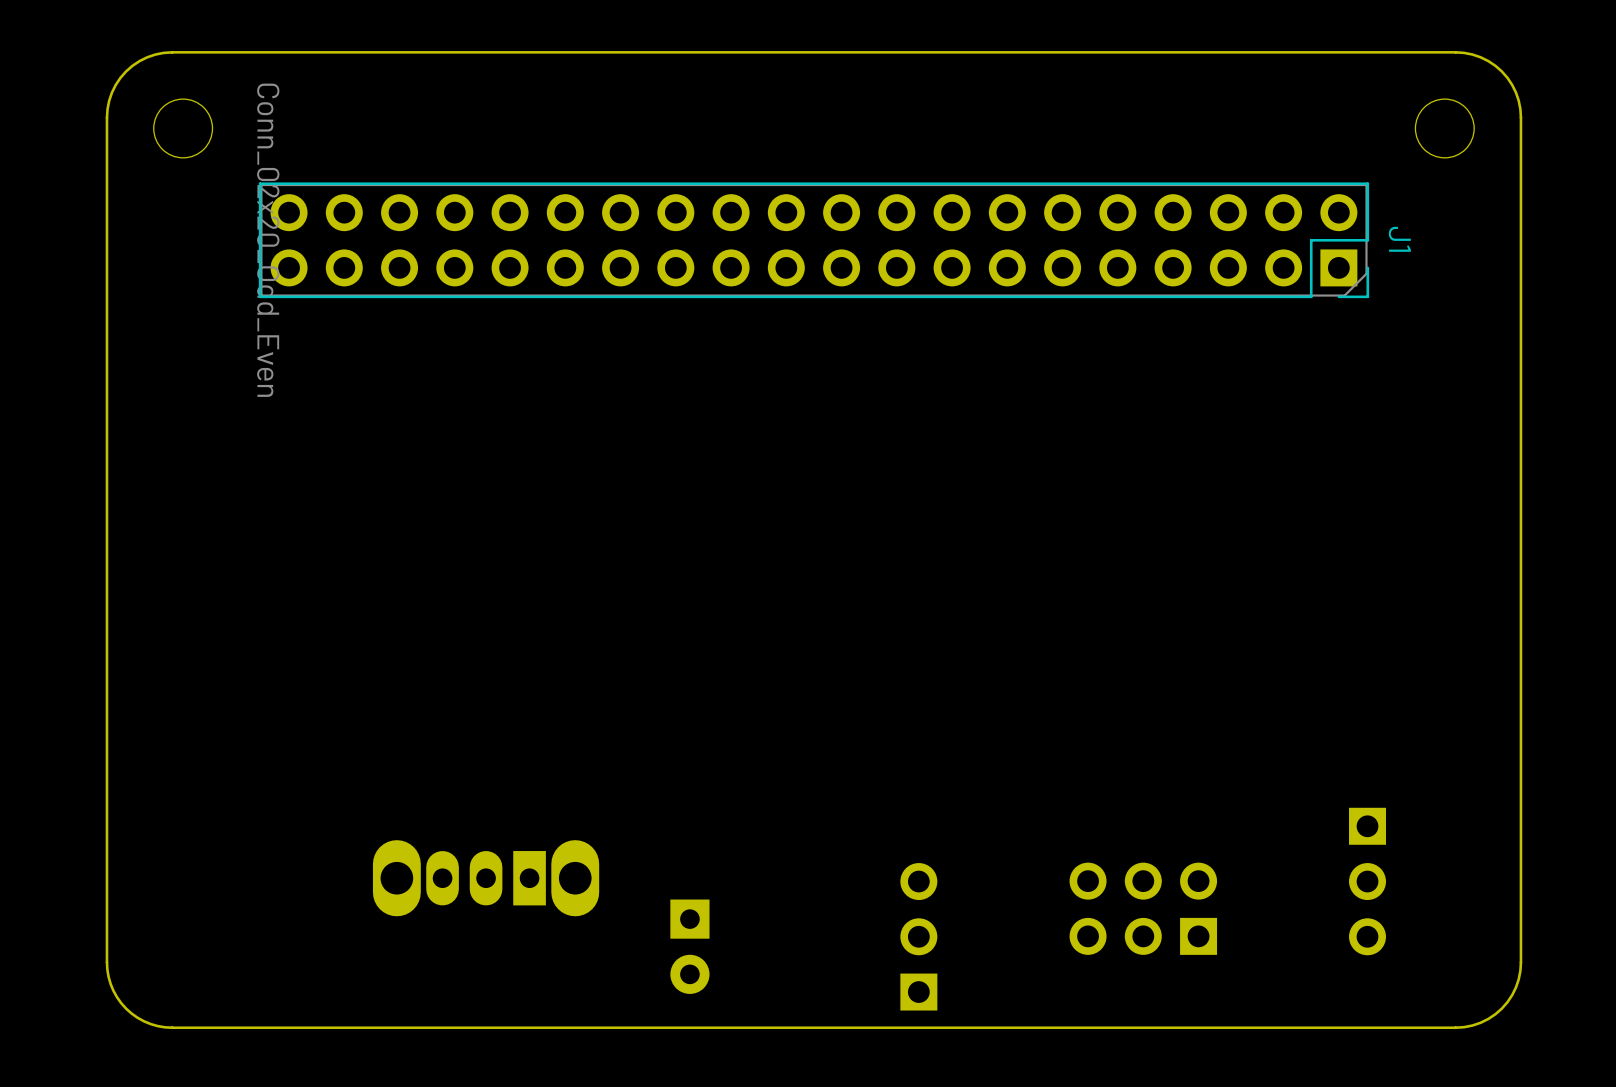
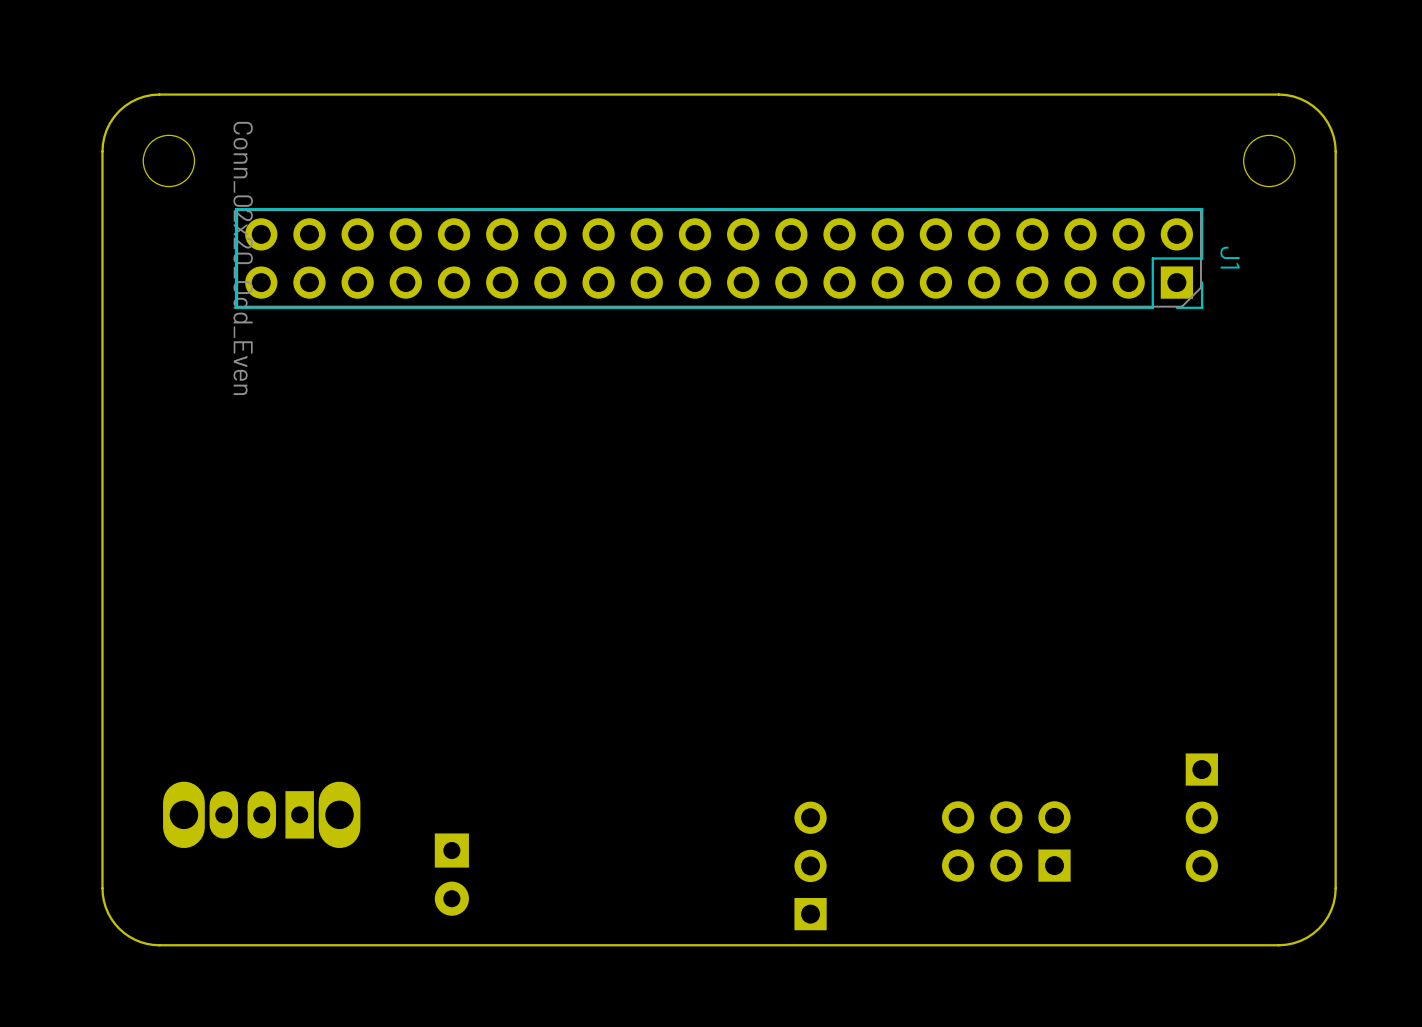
part position: (486, 878) -> (261, 814)
part position: (689, 946) -> (451, 874)

